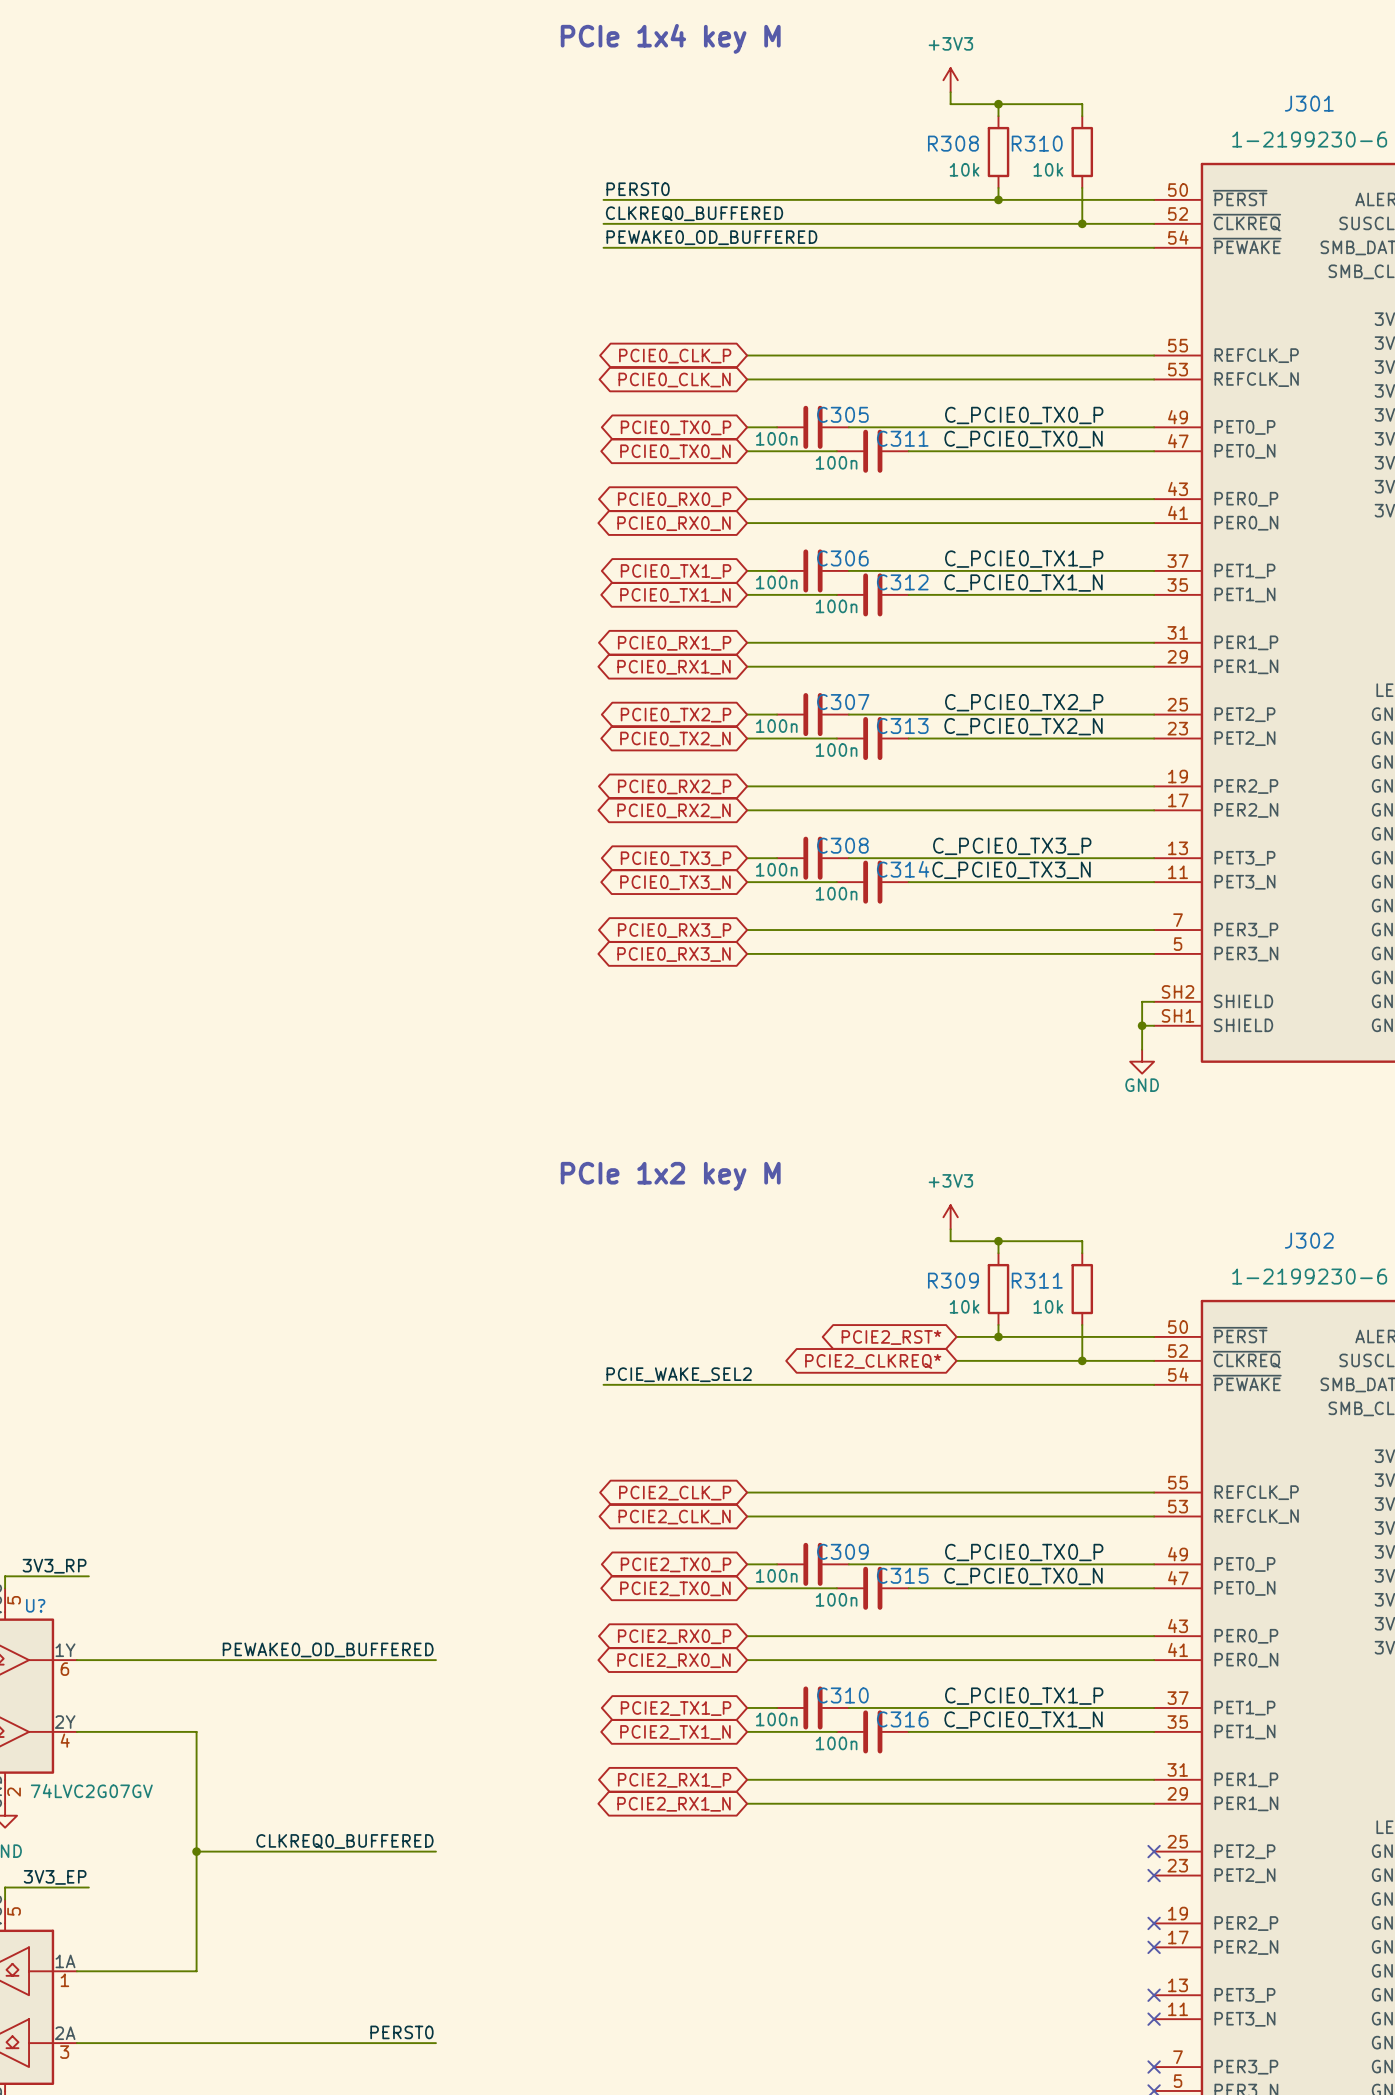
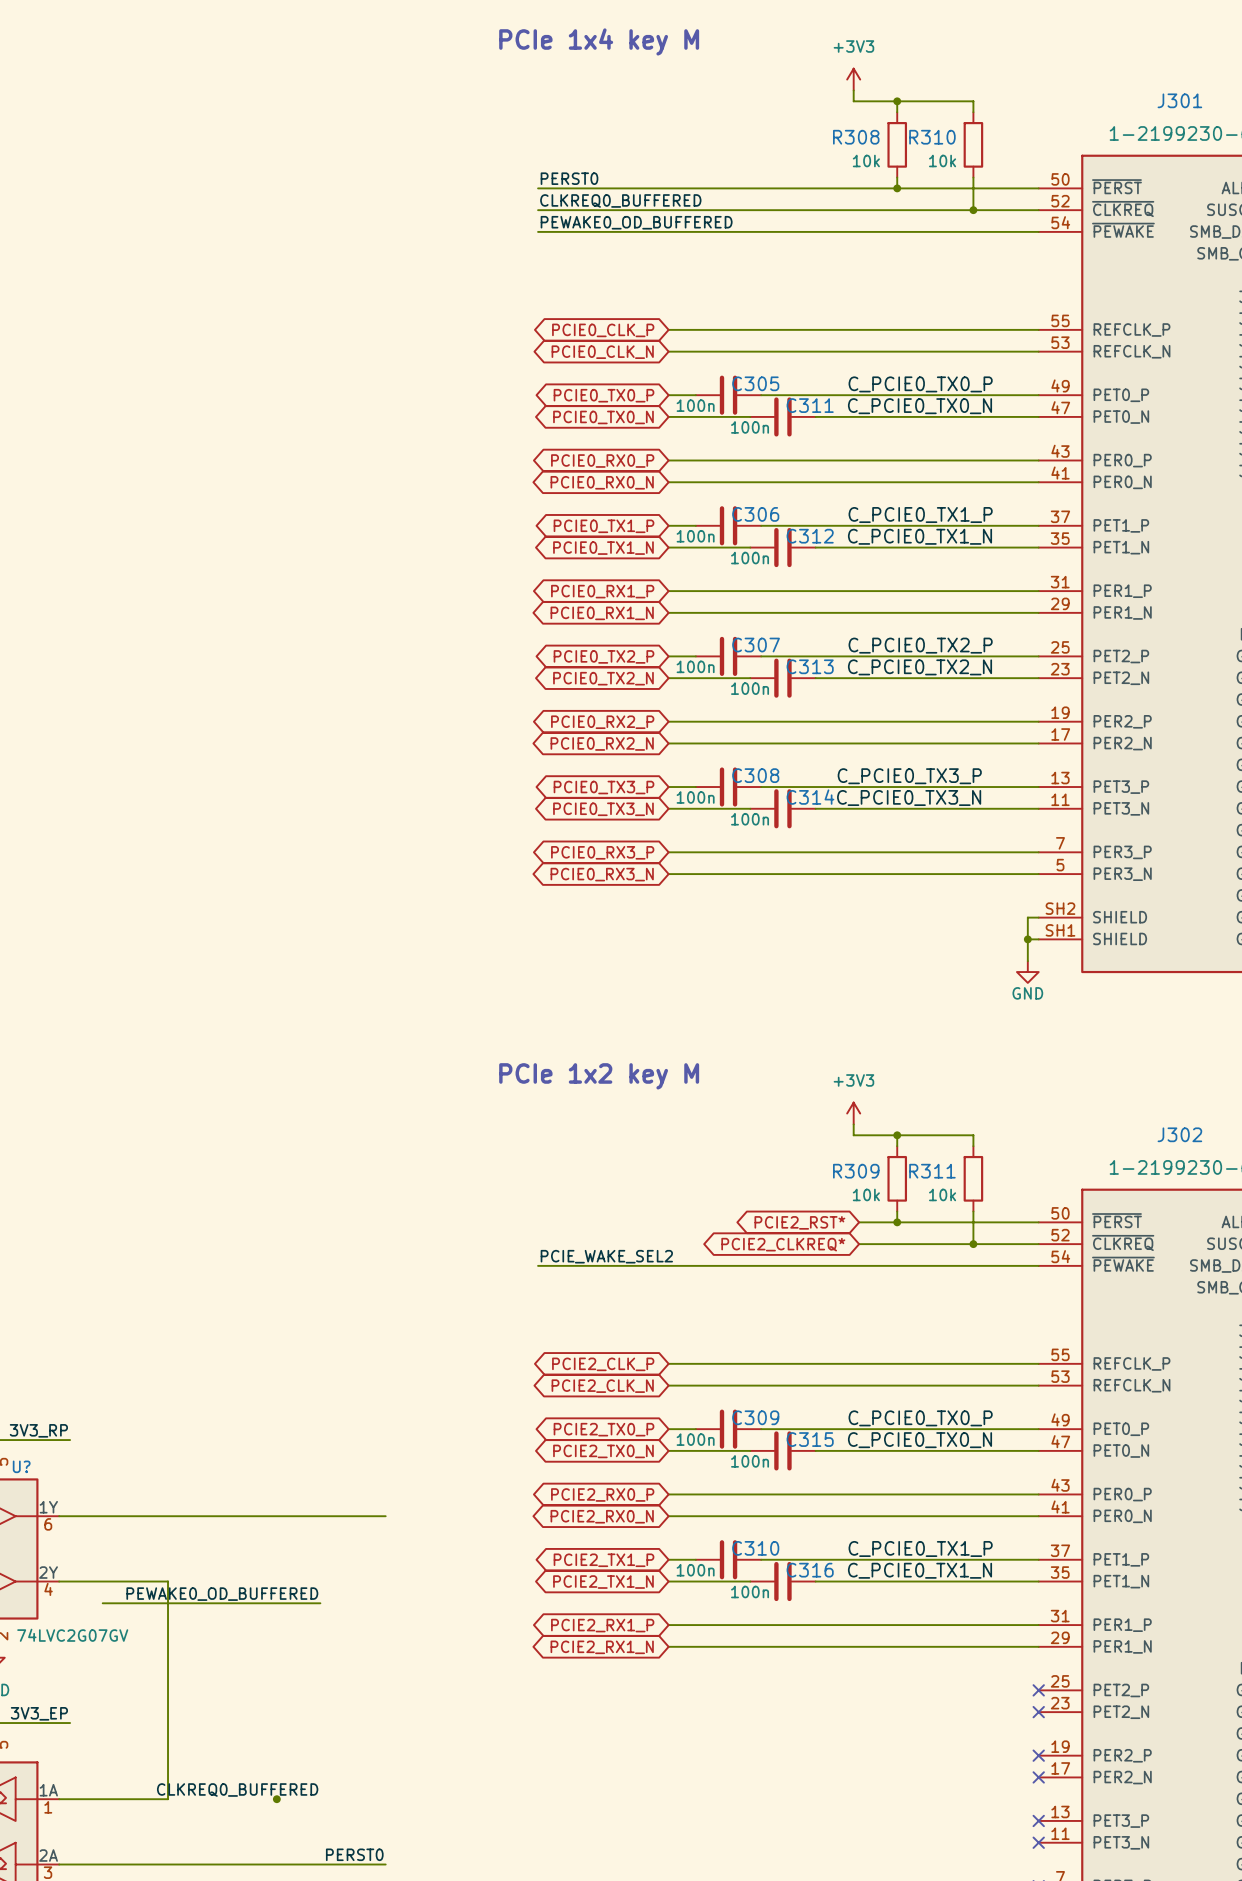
label position: PEWAKE0_OD_BUFFERED (328, 1649) -> PEWAKE0_OD_BUFFERED (222, 1594)
label position: CLKREQ0_BUFFERED (344, 1841) -> CLKREQ0_BUFFERED (237, 1790)
wire: (196, 1851) (435, 1851) -> (102, 1603) (320, 1603)
junction: (196, 1851) -> none
junction: none -> (276, 1799)

